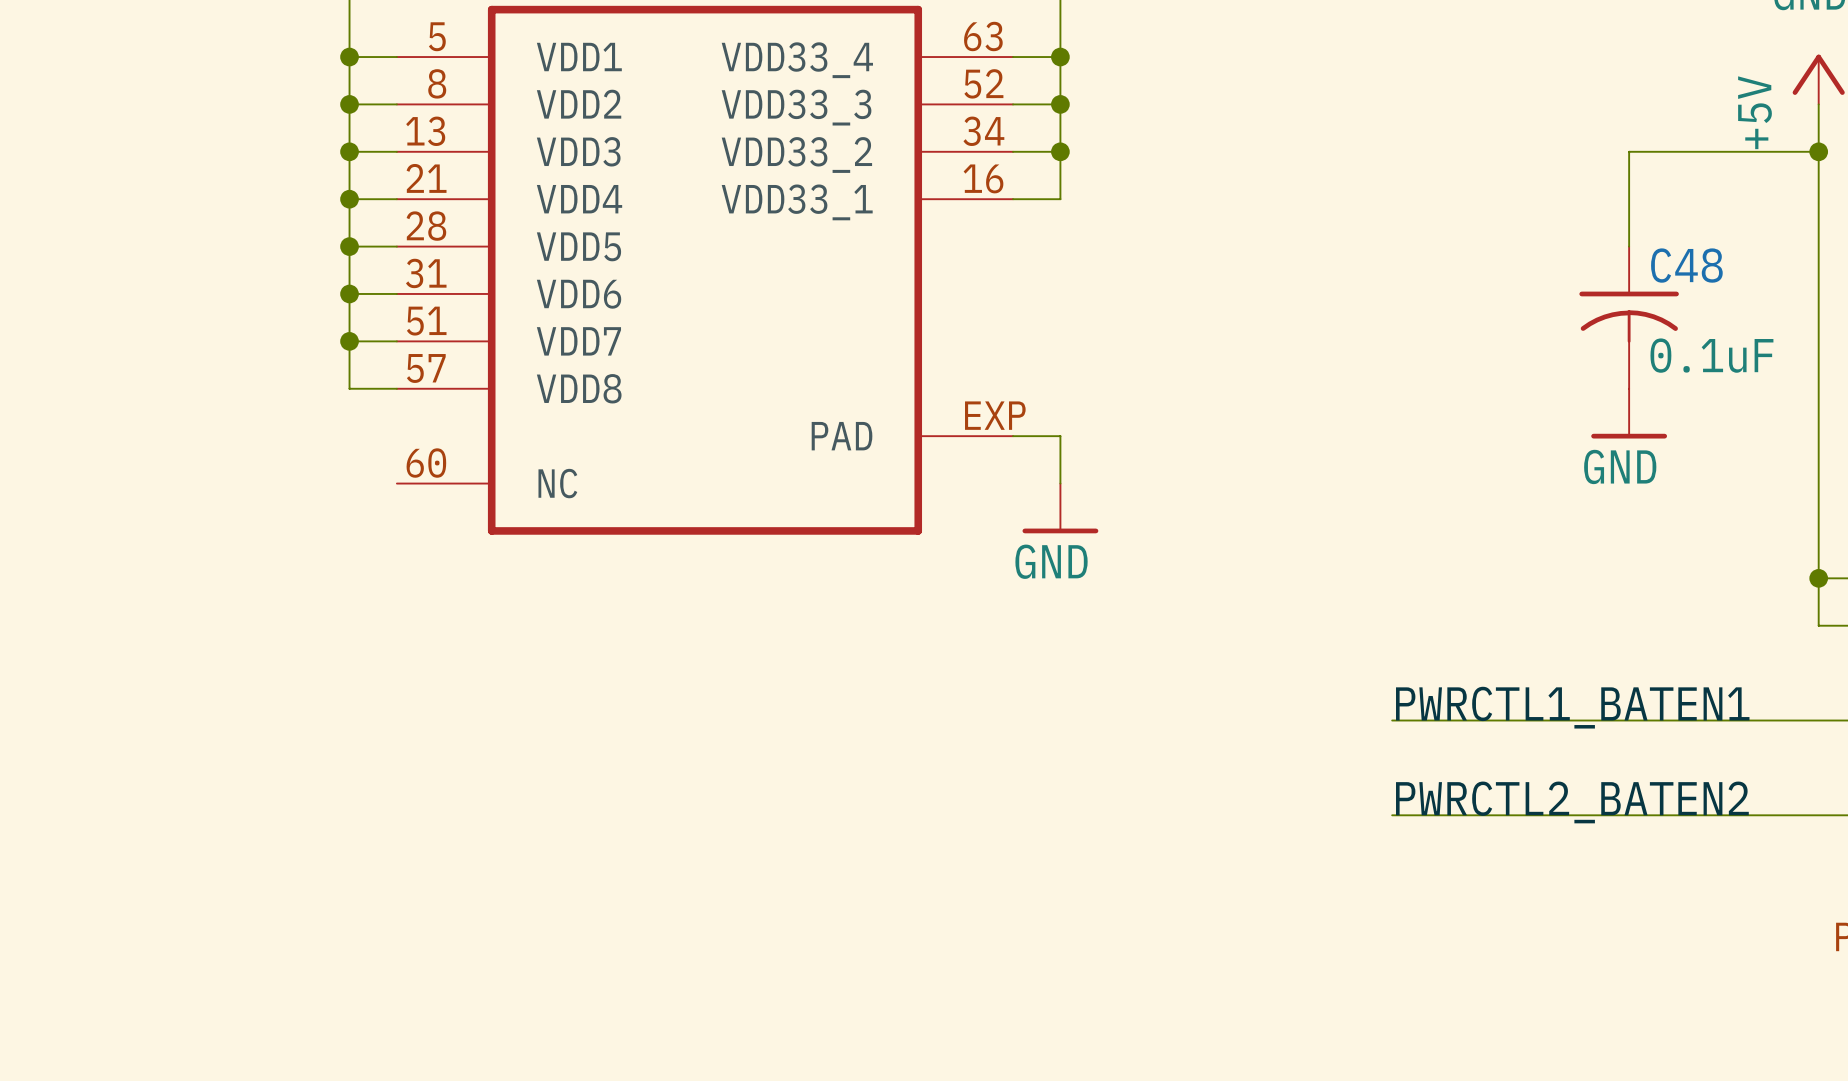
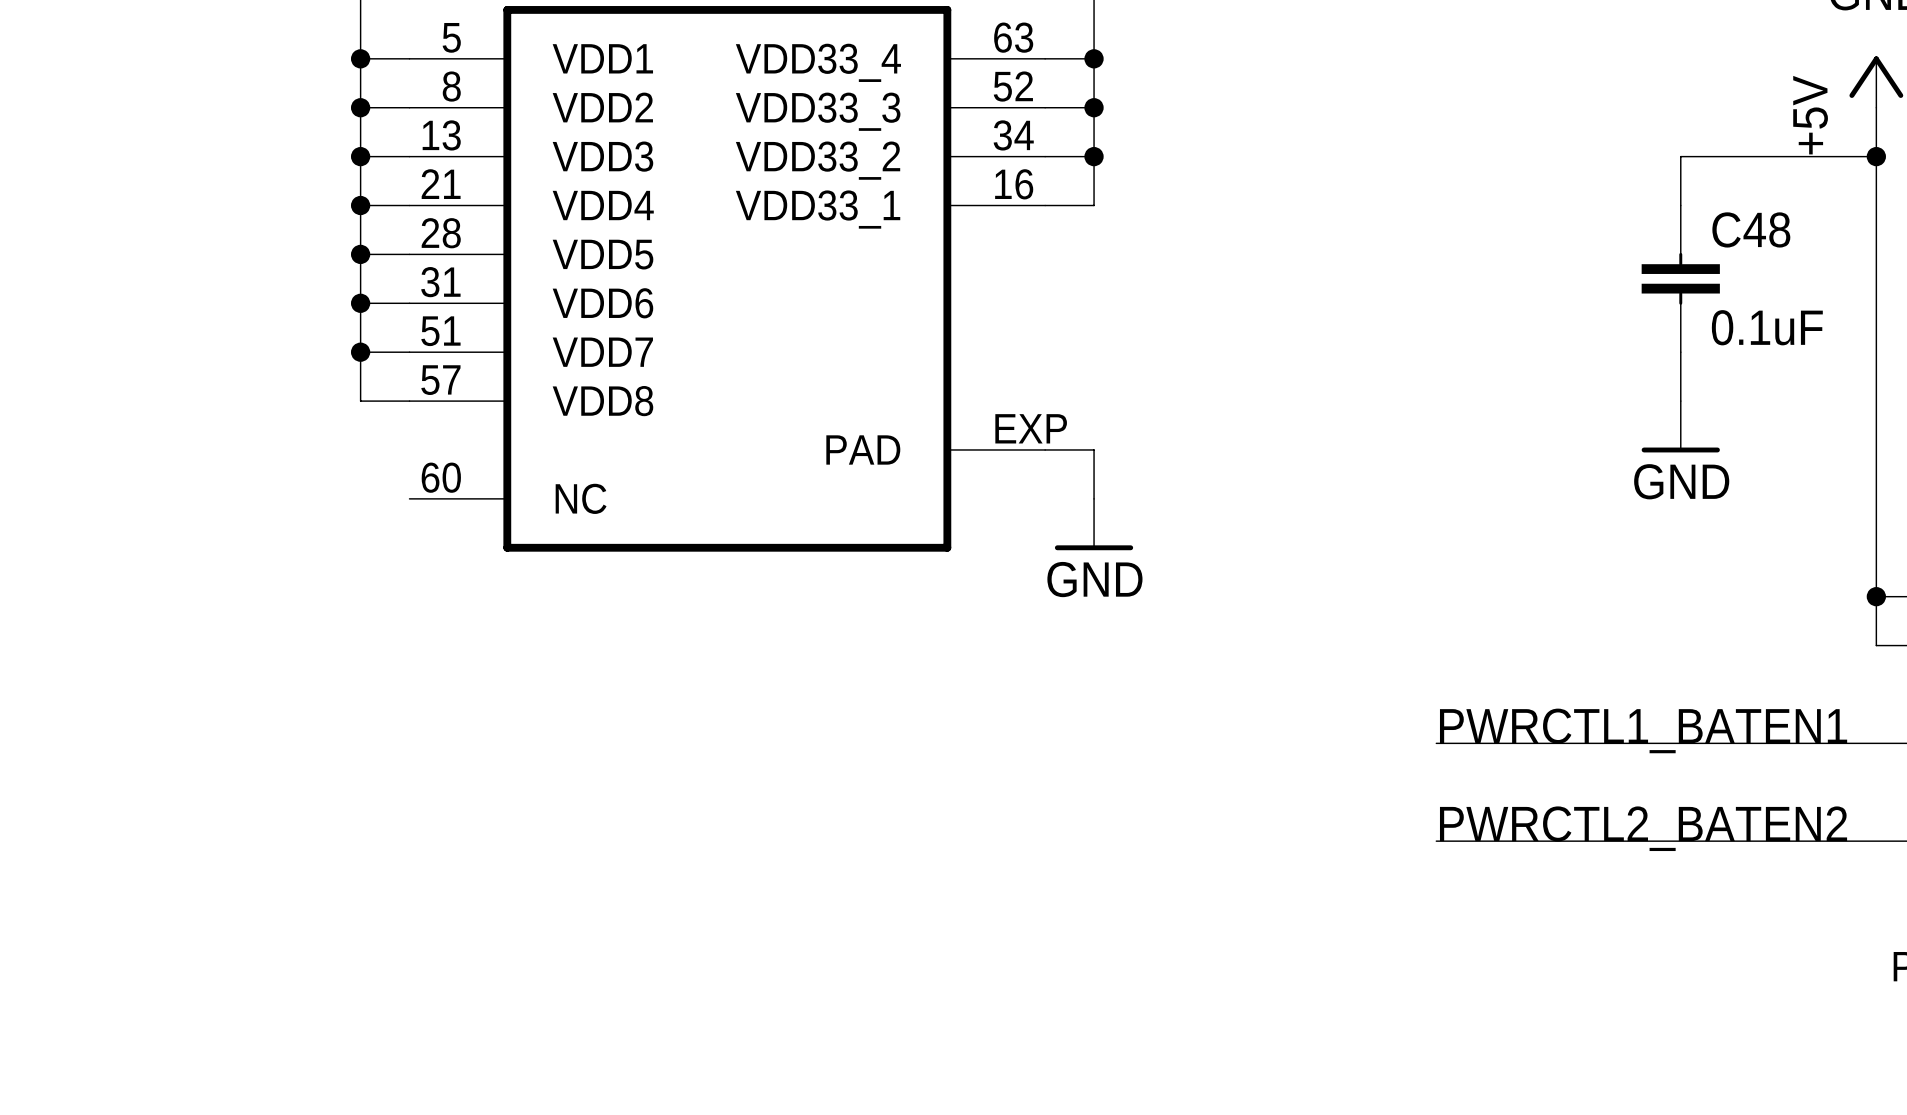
C48 symbol: [1579, 246, 1679, 389] -> [1641, 205, 1720, 353]

